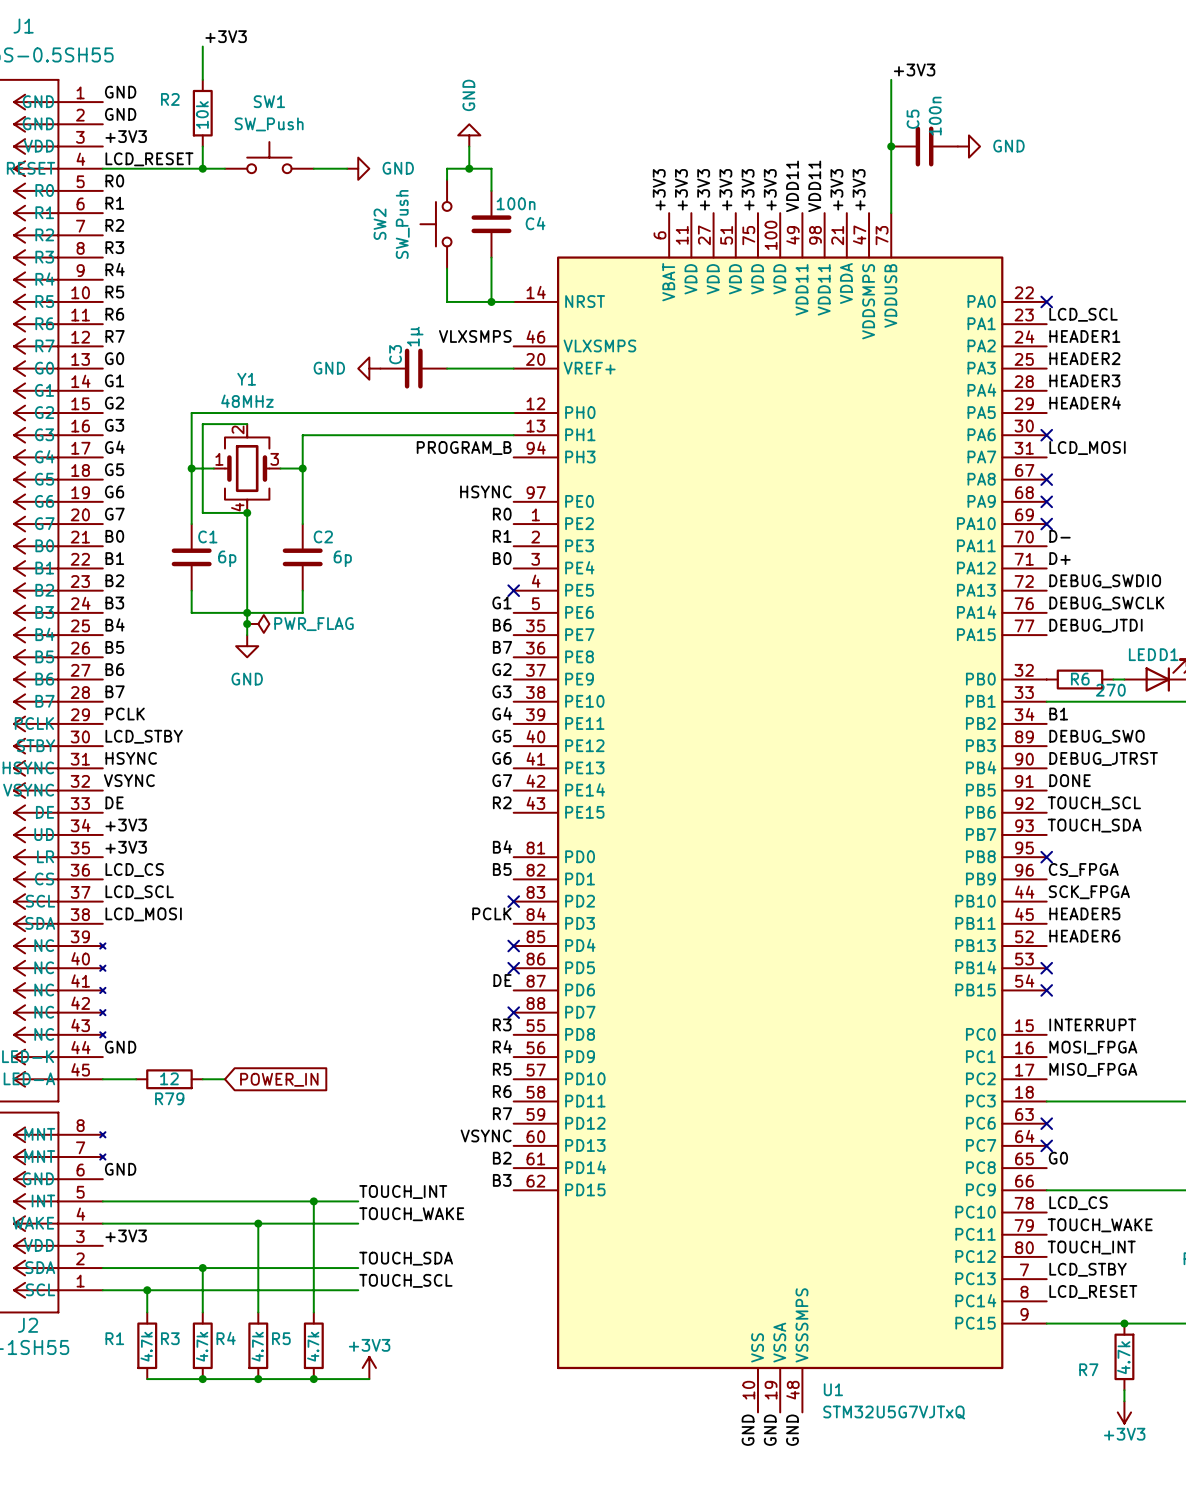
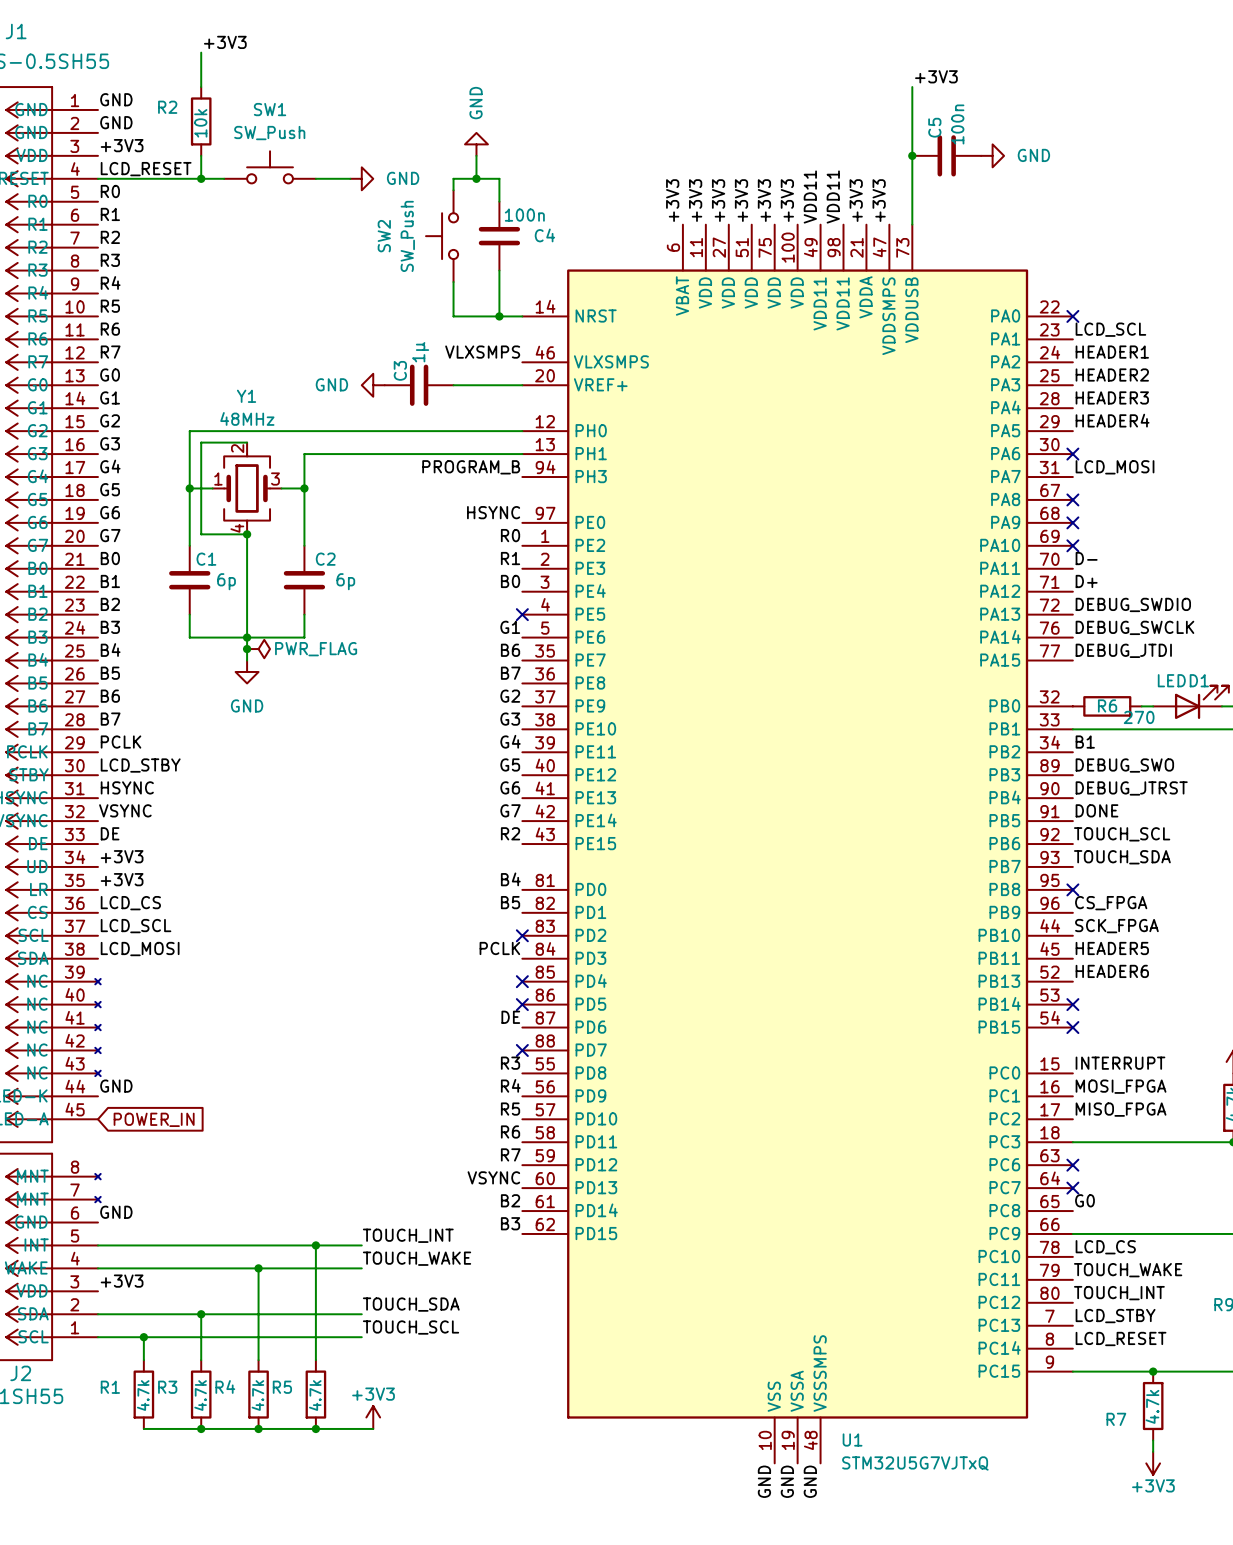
wire: (102, 1079) (136, 1079) -> none
R79: 12 (169, 1079) -> none
wire: (202, 1079) (224, 1079) -> none
global label position: POWER_IN (279, 1079) -> POWER_IN (154, 1119)

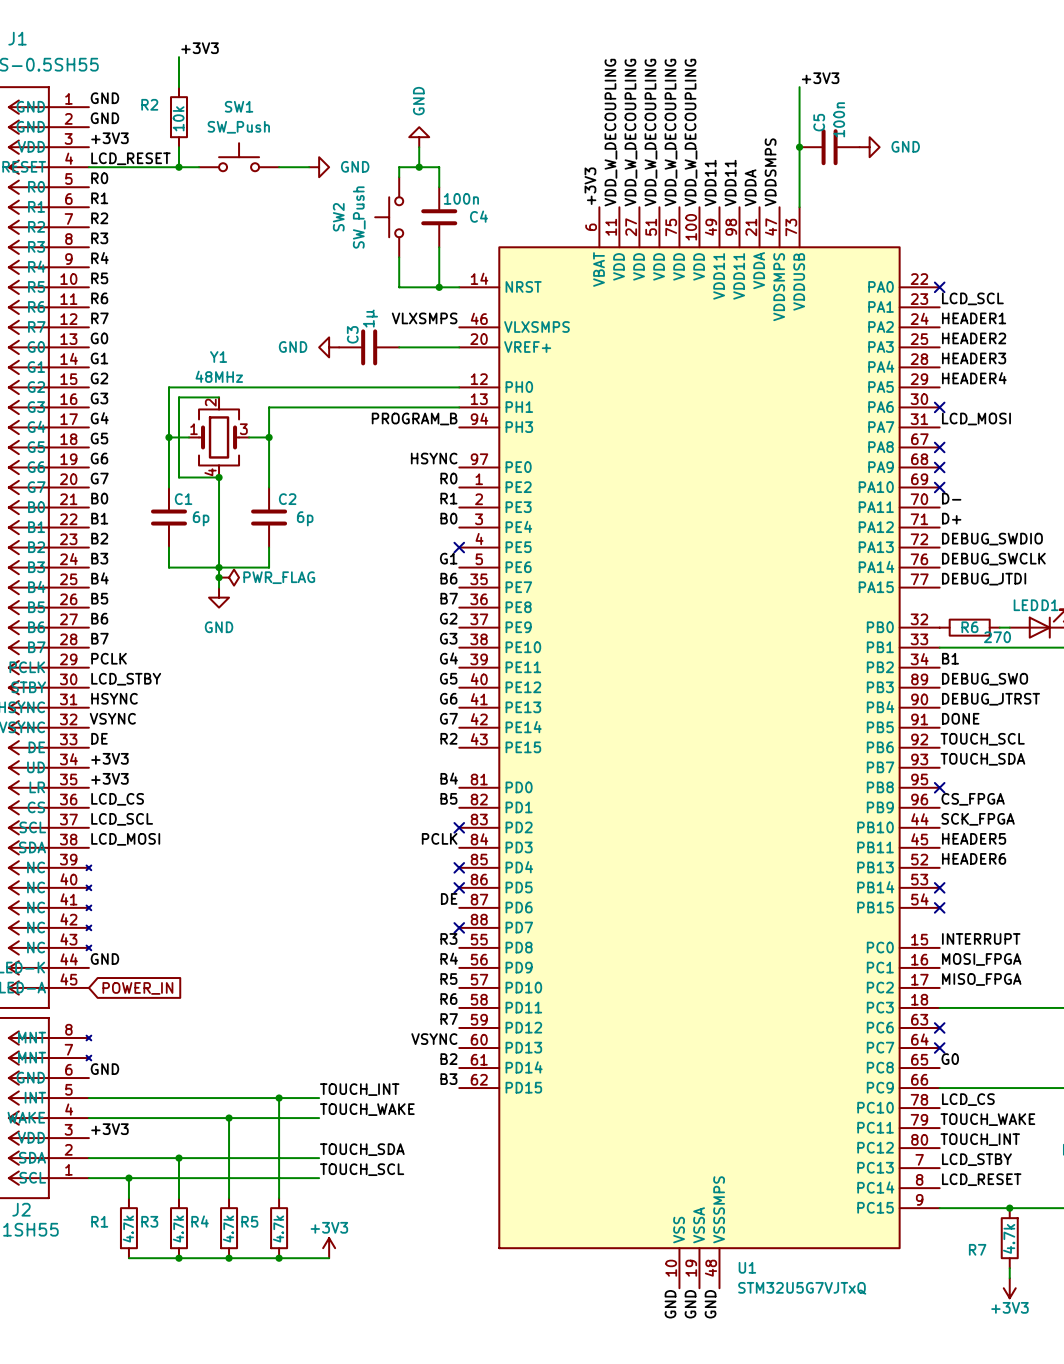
label: +3V3 (695, 200) -> VDD_W_DECOUPLING (610, 132)
label: +3V3 (718, 200) -> VDD_W_DECOUPLING (630, 132)
label: +3V3 (741, 200) -> VDD_W_DECOUPLING (650, 132)
label: +3V3 (764, 200) -> VDD_W_DECOUPLING (670, 132)
label: +3V3 (787, 200) -> VDD_W_DECOUPLING (691, 132)
label: +3V3 (856, 200) -> VDDA (750, 187)
label: +3V3 (879, 200) -> VDDSMPS (770, 172)

